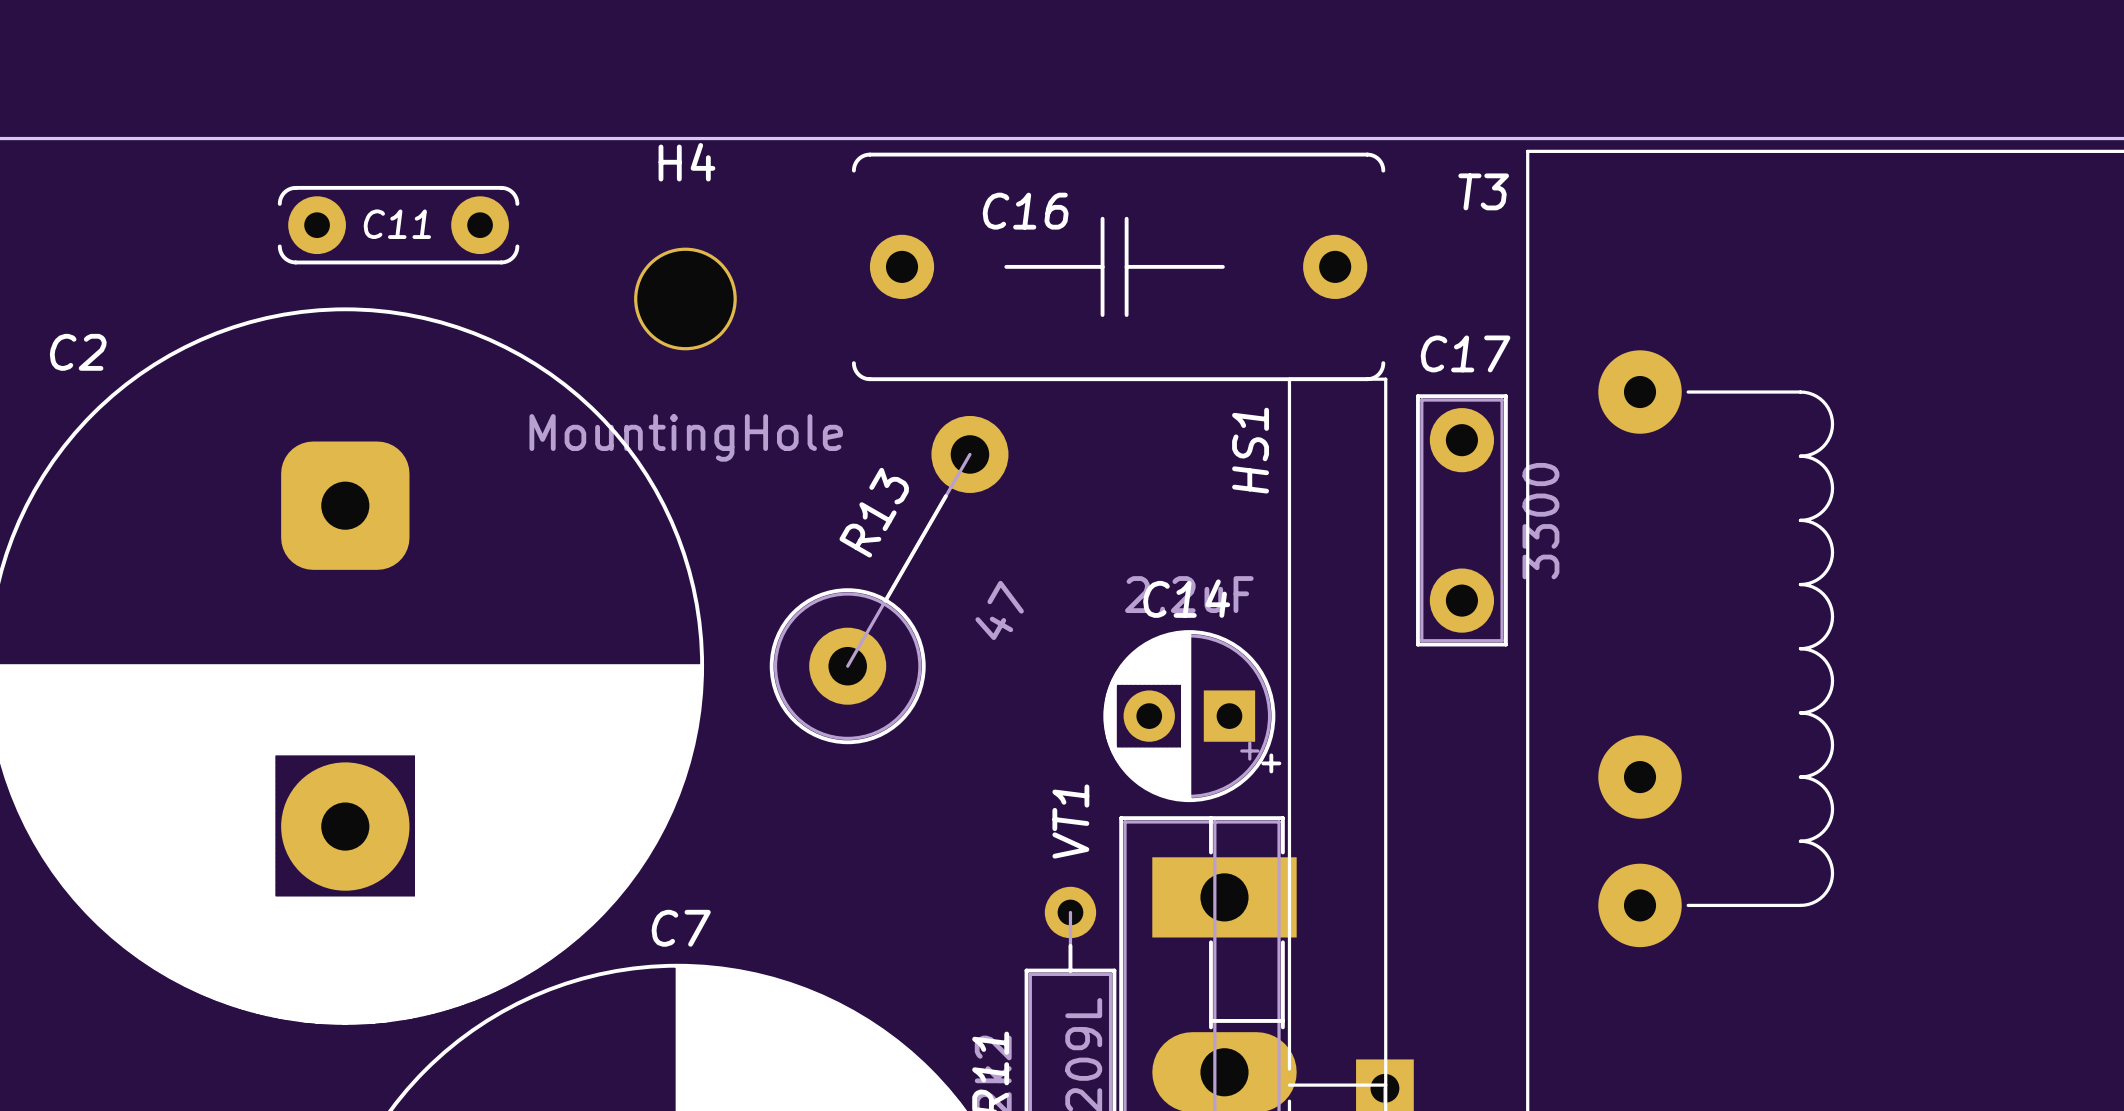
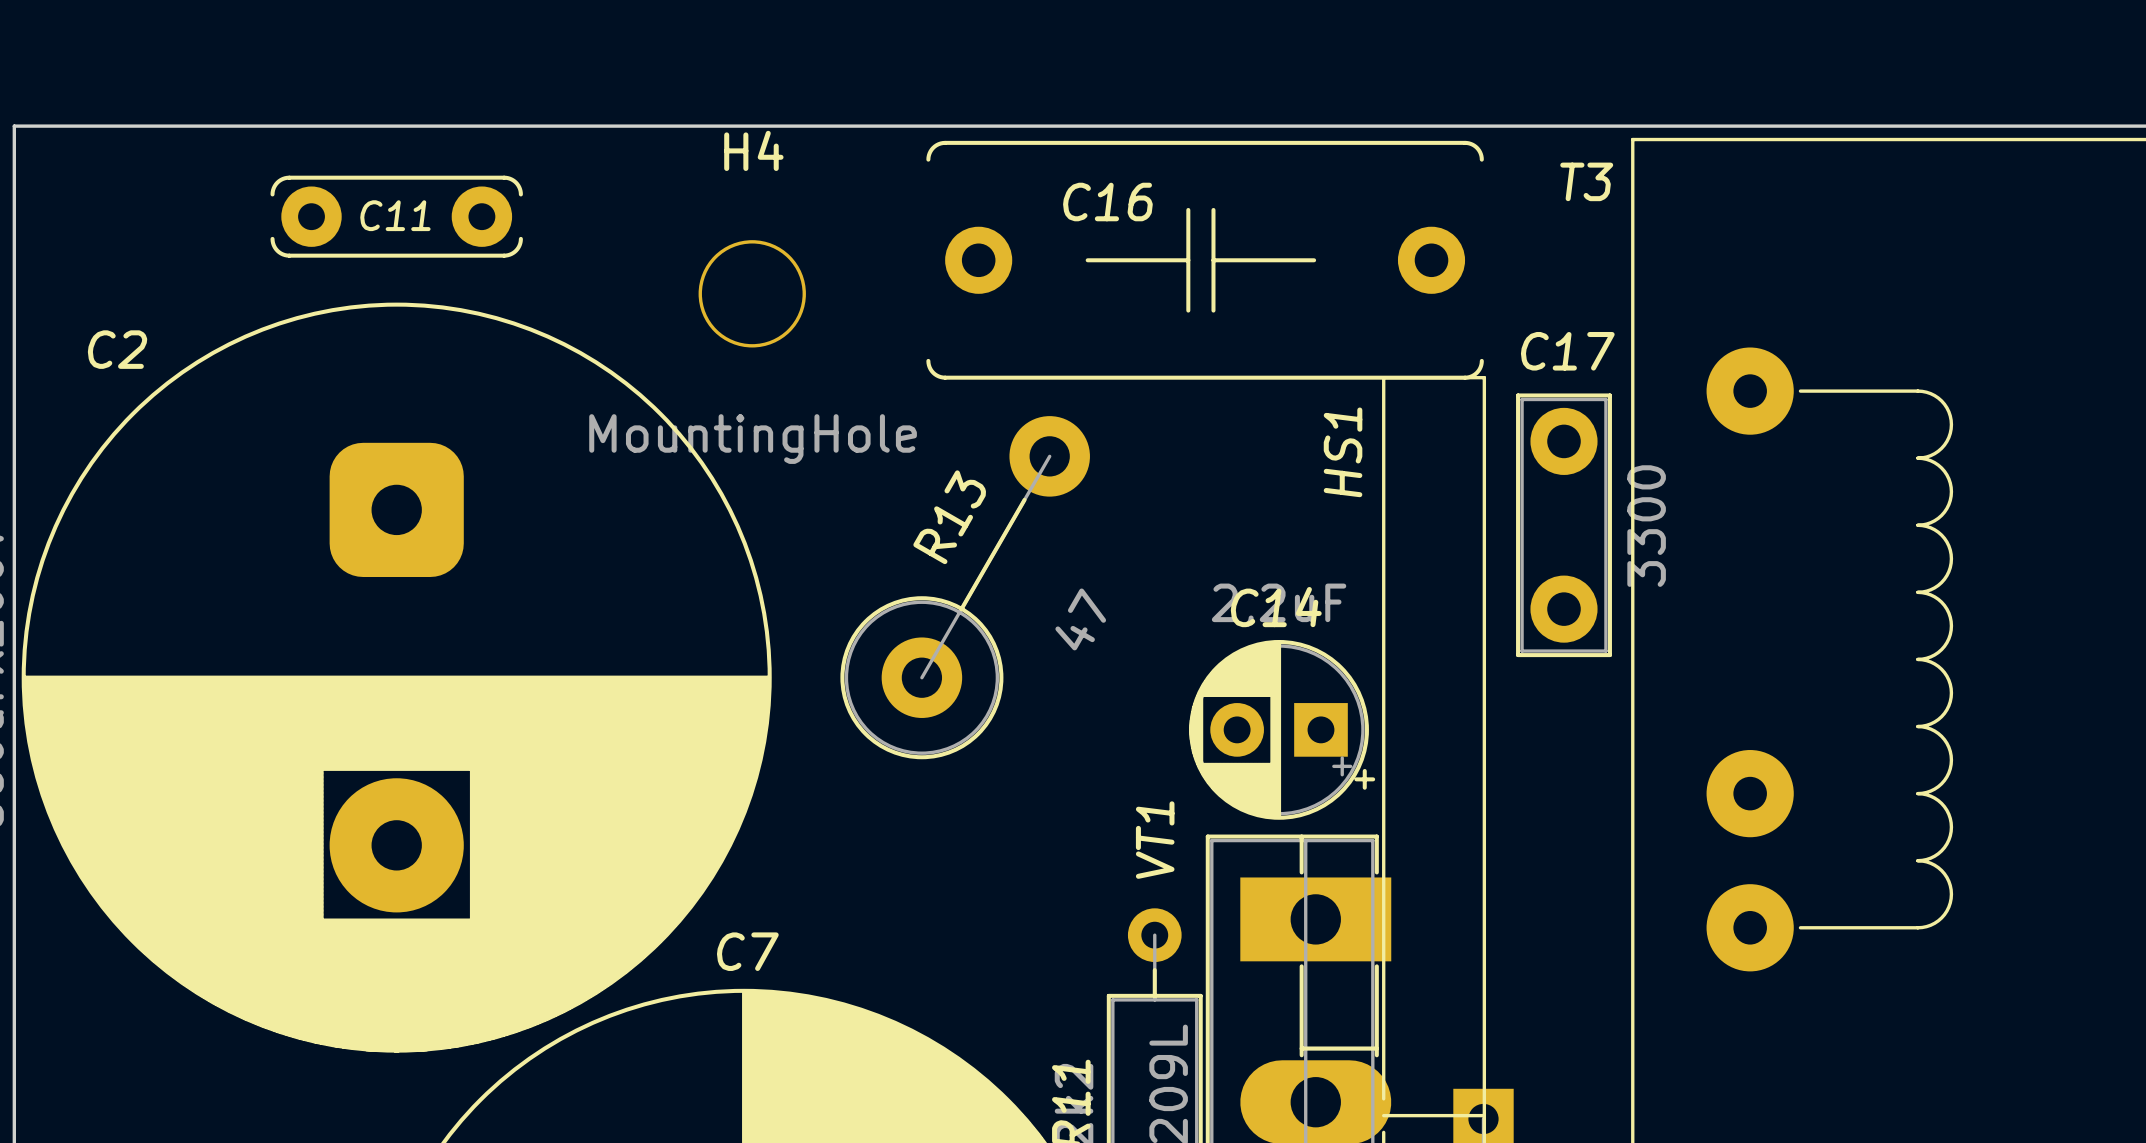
C11 position: (398, 225) -> (396, 216)

